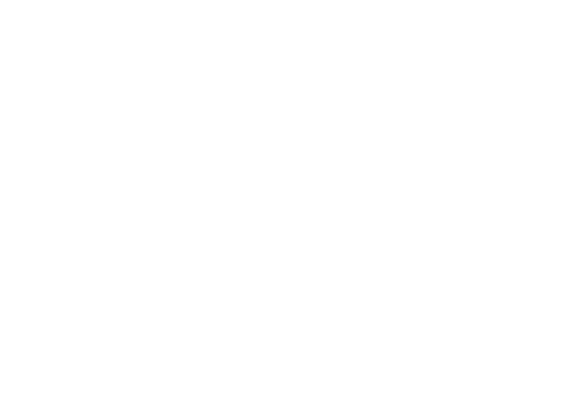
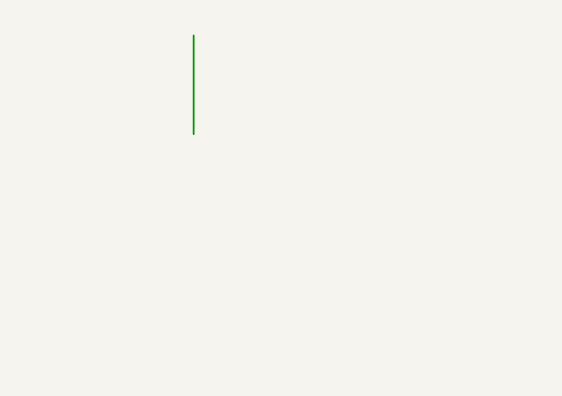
wire: none -> (193, 35) (193, 134)

